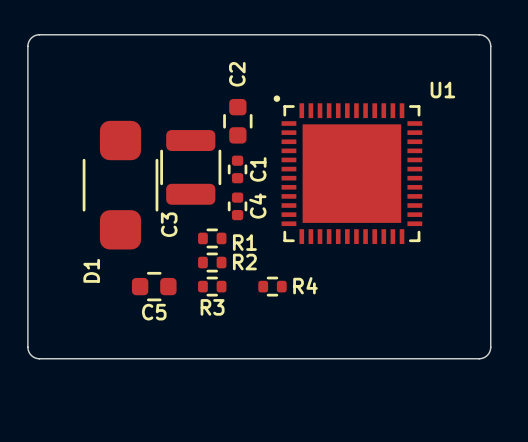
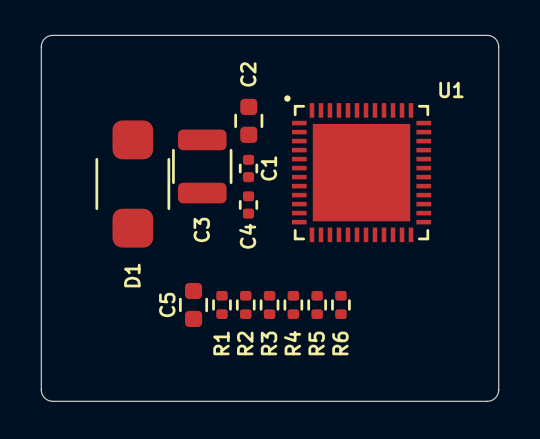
C4 name position: C4 (257, 206) -> C4 (247, 236)
C3 name position: C3 (169, 224) -> C3 (201, 229)
R1 rotation: 0° (212, 238) -> 90° clockwise (221, 304)
R1 position: (212, 238) -> (221, 304)
R2 rotation: 0° (212, 262) -> 90° clockwise (245, 304)
R2 position: (212, 262) -> (245, 304)
D1 name position: D1 (91, 270) -> D1 (132, 275)
C5 rotation: 0° (154, 286) -> 90° clockwise (193, 304)
C5 position: (154, 286) -> (193, 304)
R3 rotation: 0° (212, 286) -> 90° clockwise (269, 304)
R3 position: (212, 286) -> (269, 304)
R4 rotation: 0° (272, 286) -> 90° clockwise (293, 304)
R4 position: (272, 286) -> (293, 304)
R5: none -> (317, 304)
R6: none -> (340, 304)
board edge: (27, 347) (31, 355) (39, 358) (479, 358) (487, 355) (490, 347) -> (41, 344) (41, 392) (45, 398) (52, 401) (488, 401) (494, 398) (498, 392) (498, 344)

